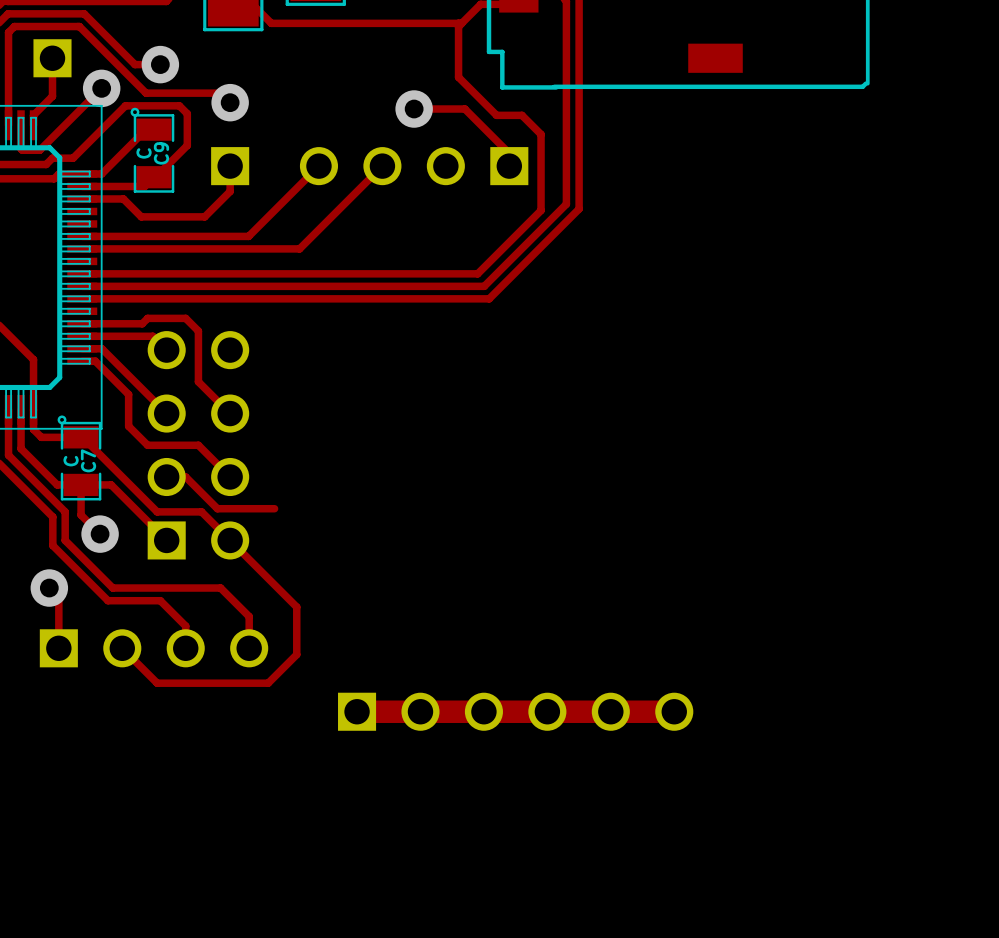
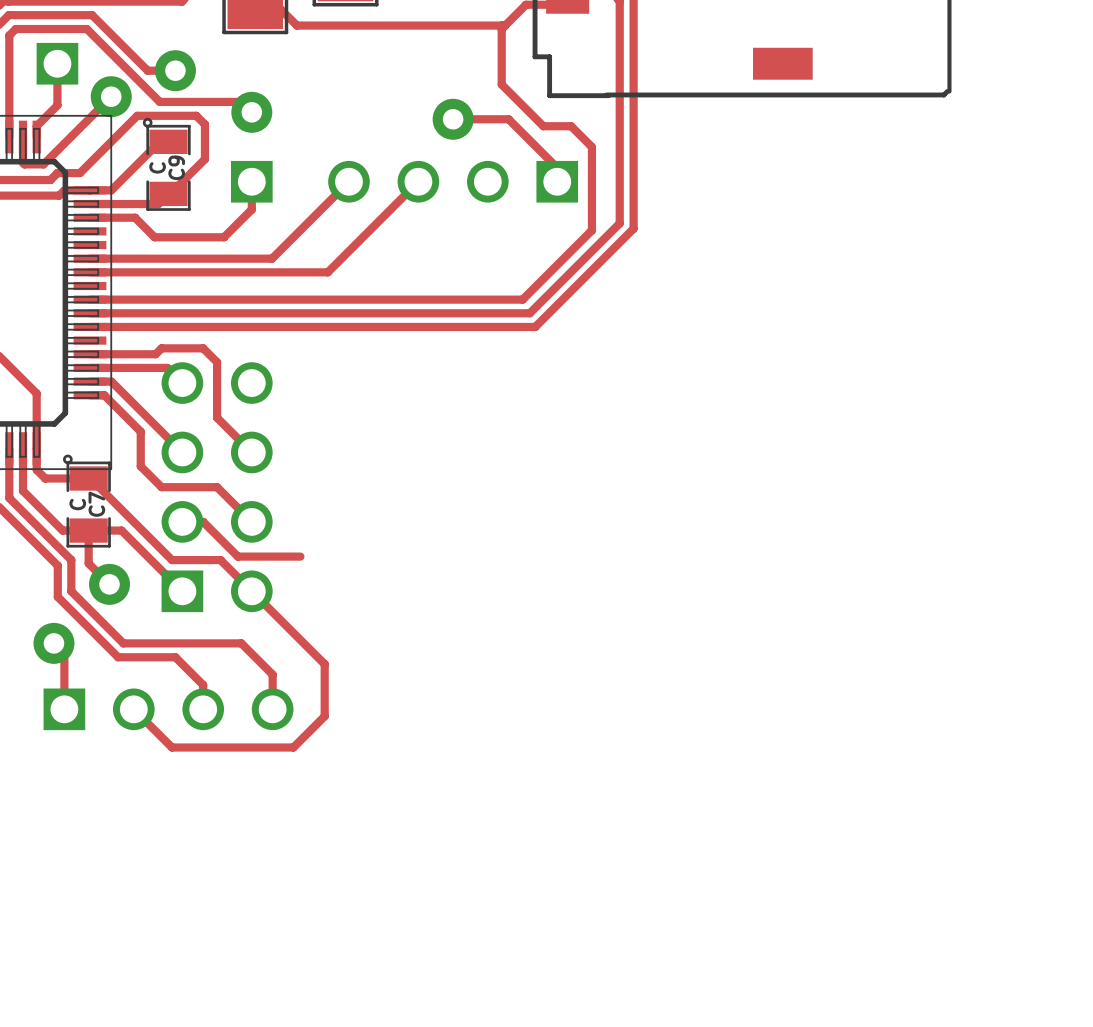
track: (357, 711) (674, 711) -> none
part: (515, 711) -> none

